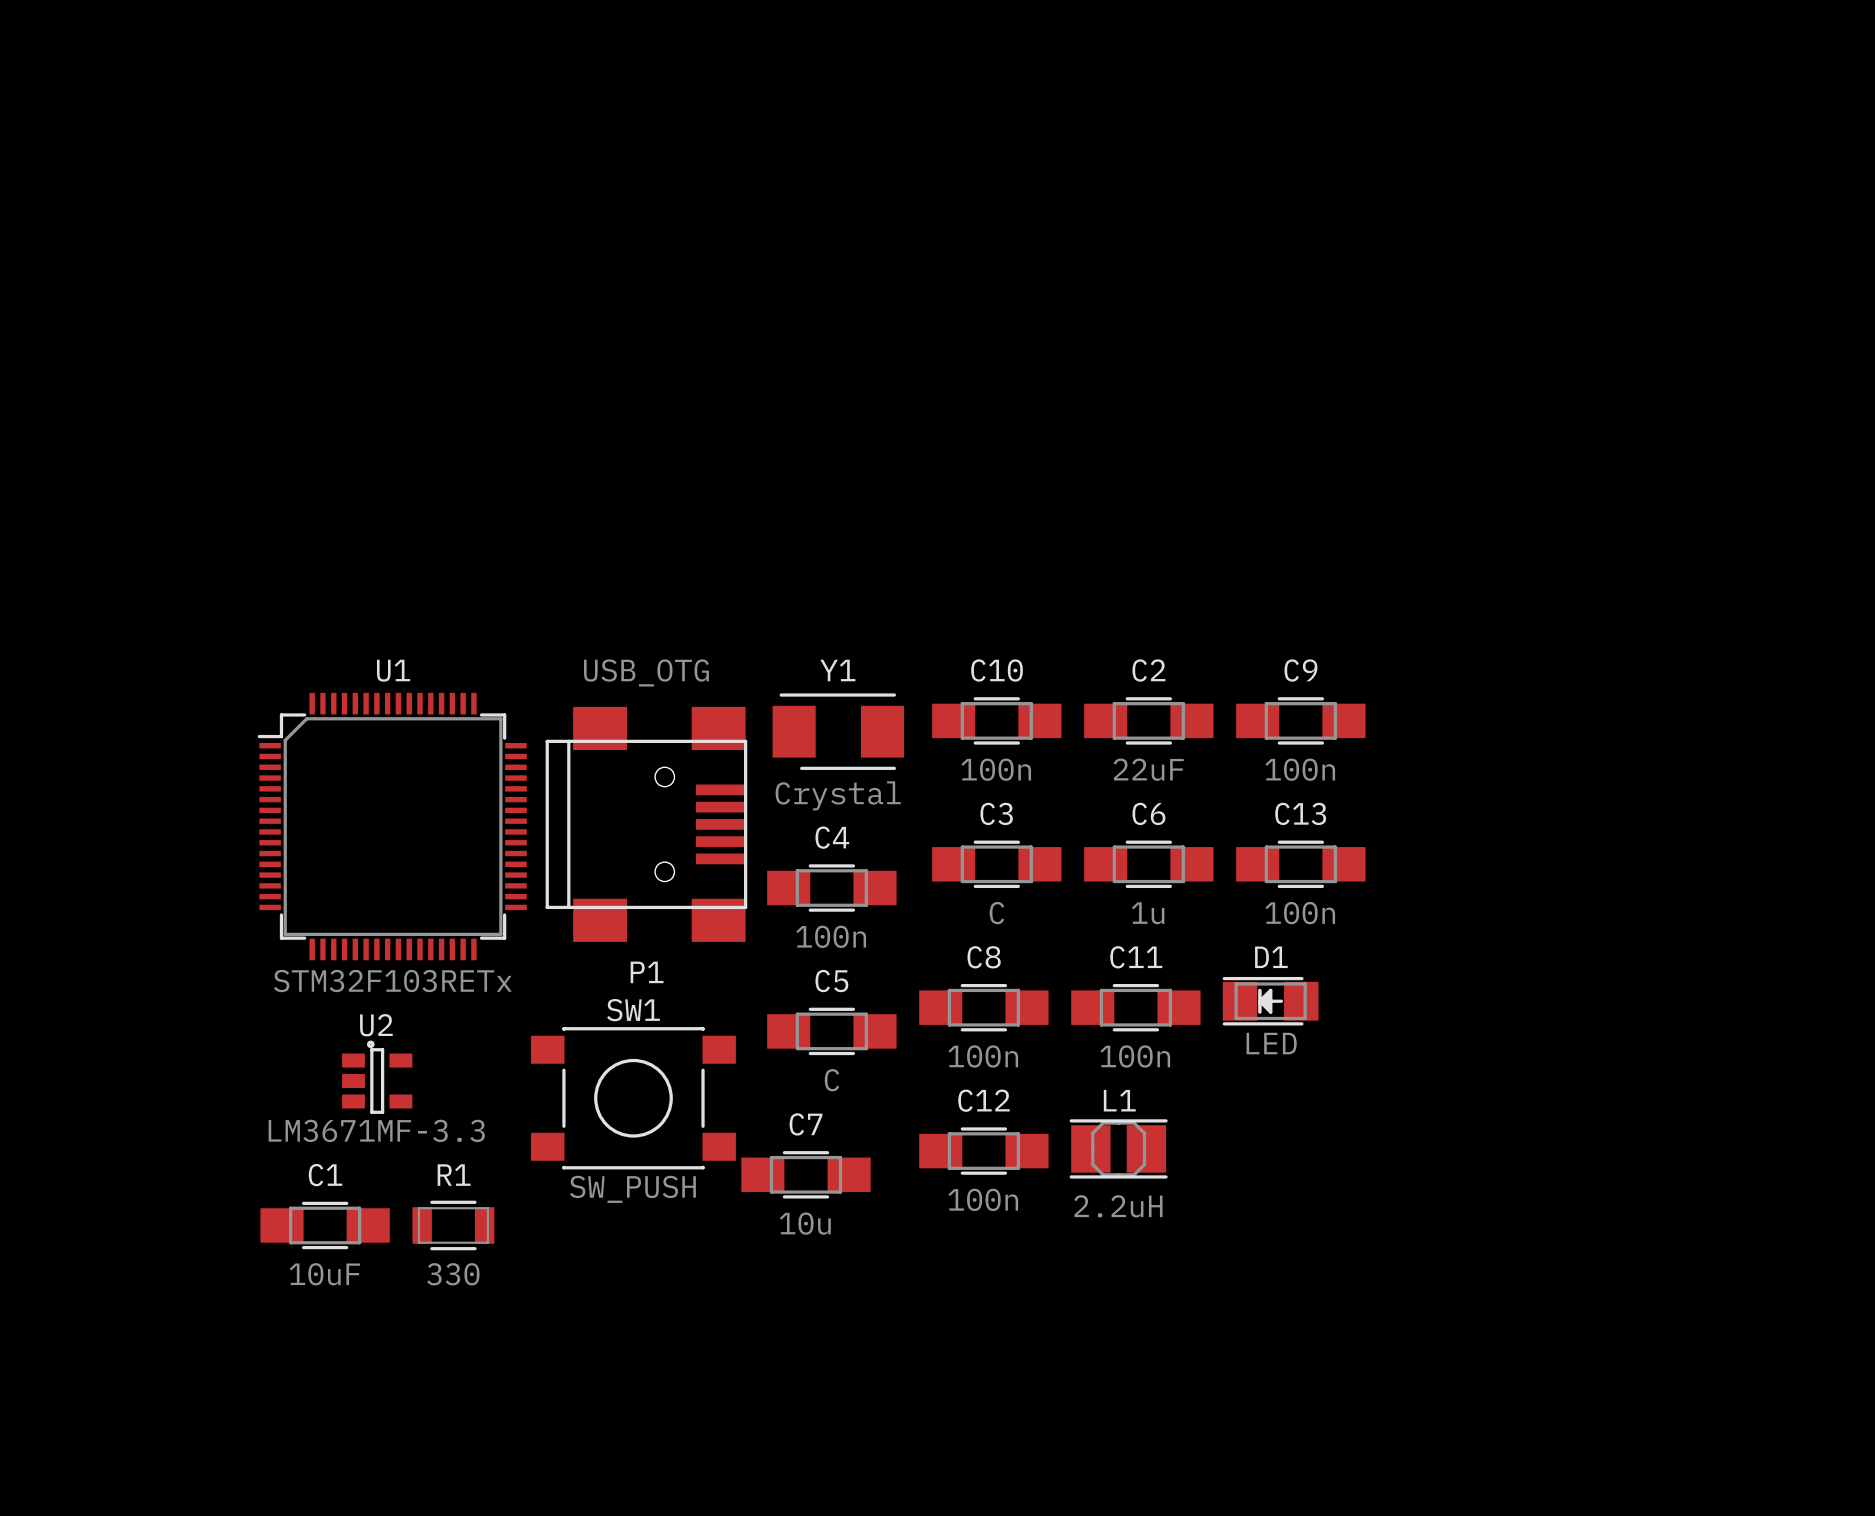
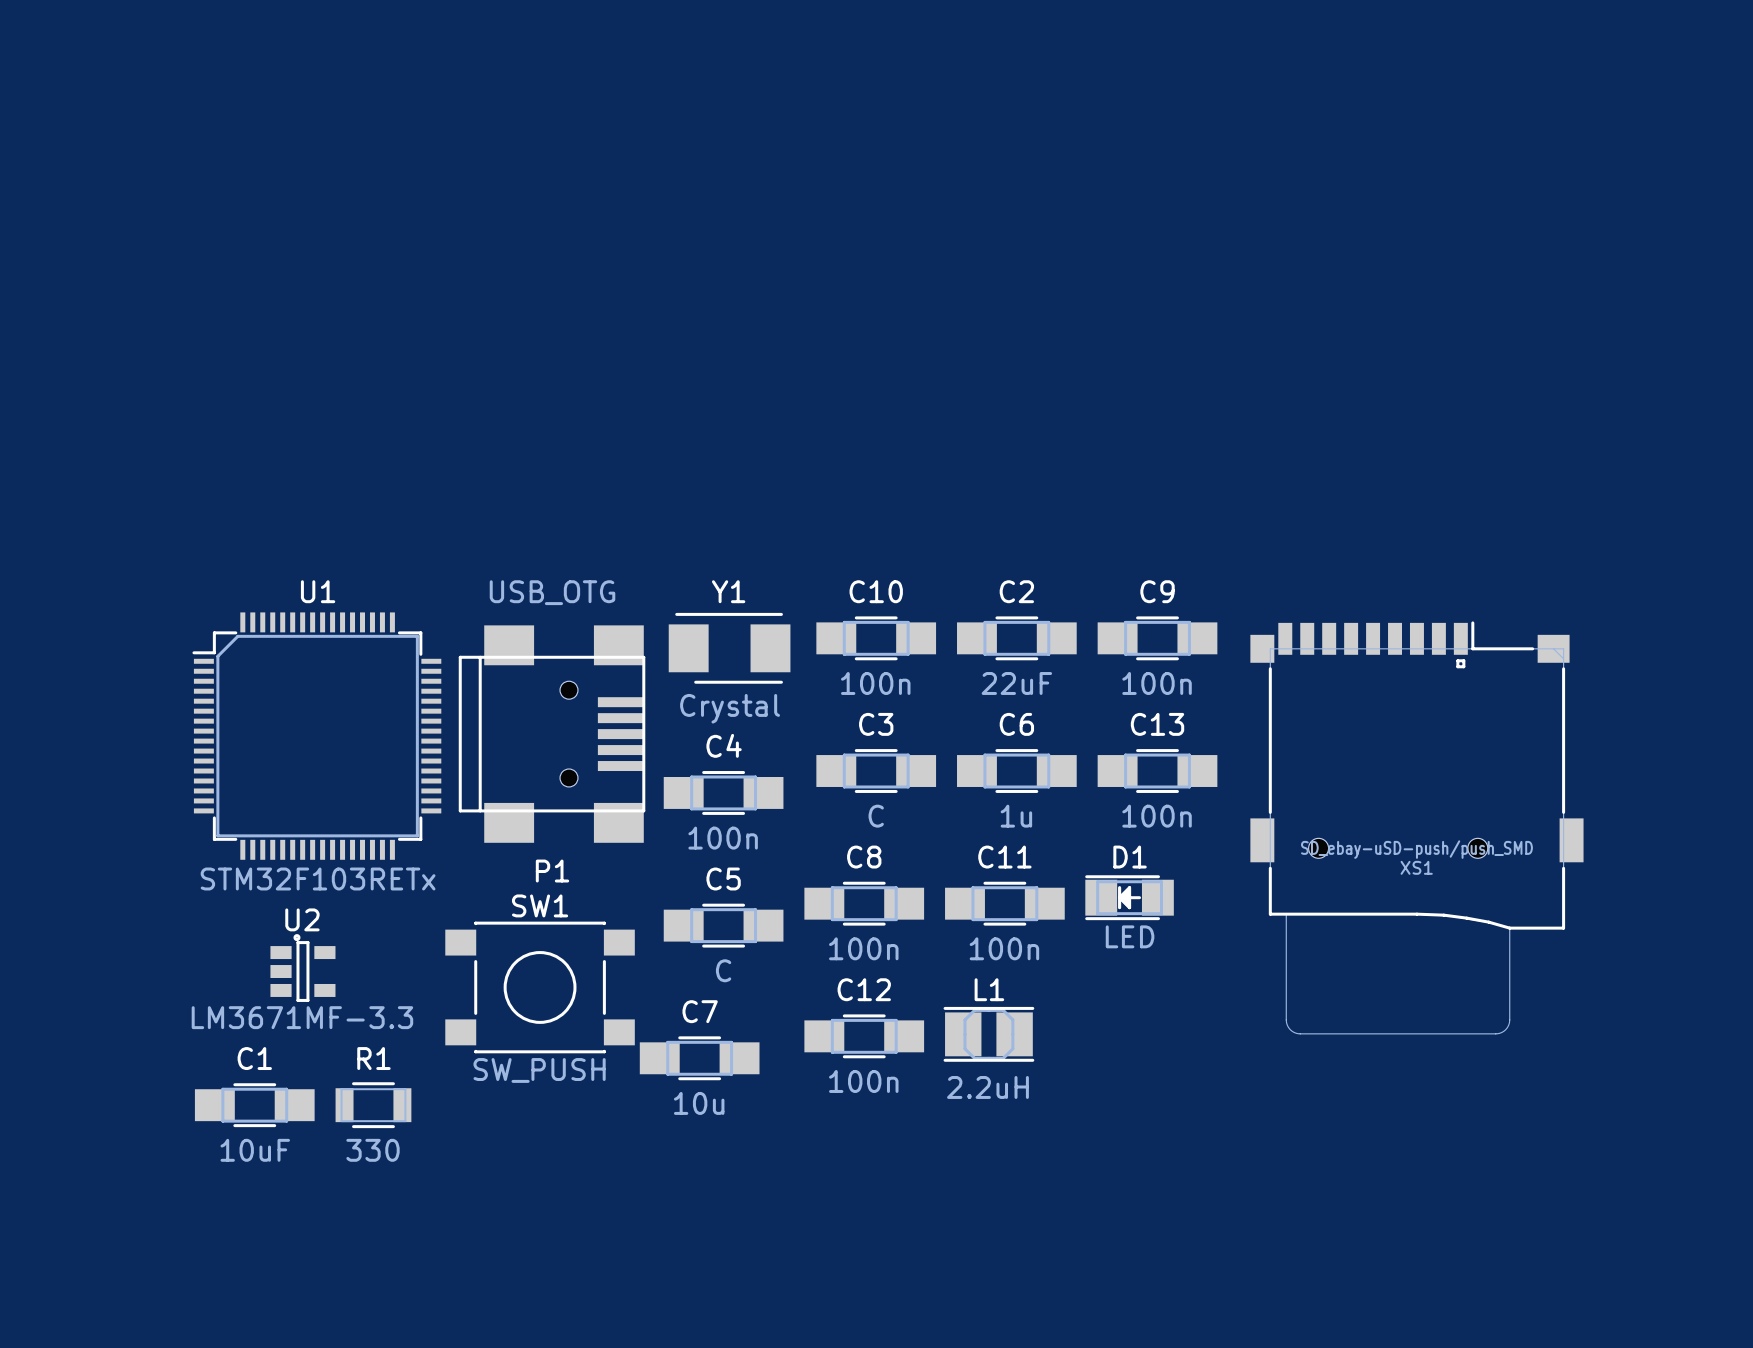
XS1: none -> SD_ebay-uSD-push/push_SMD (1416, 827)

